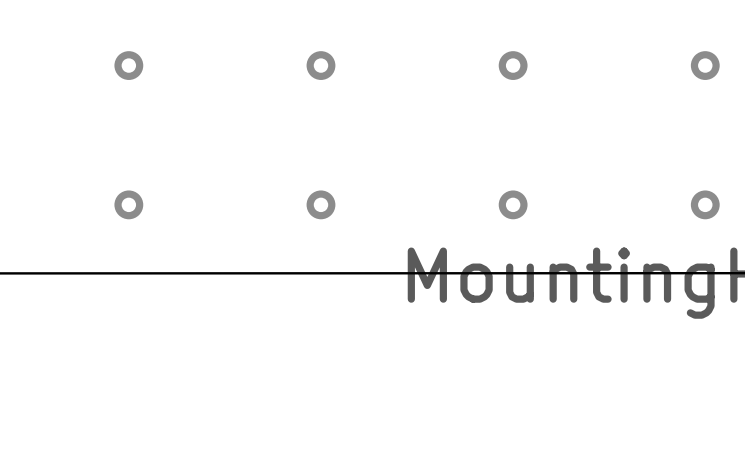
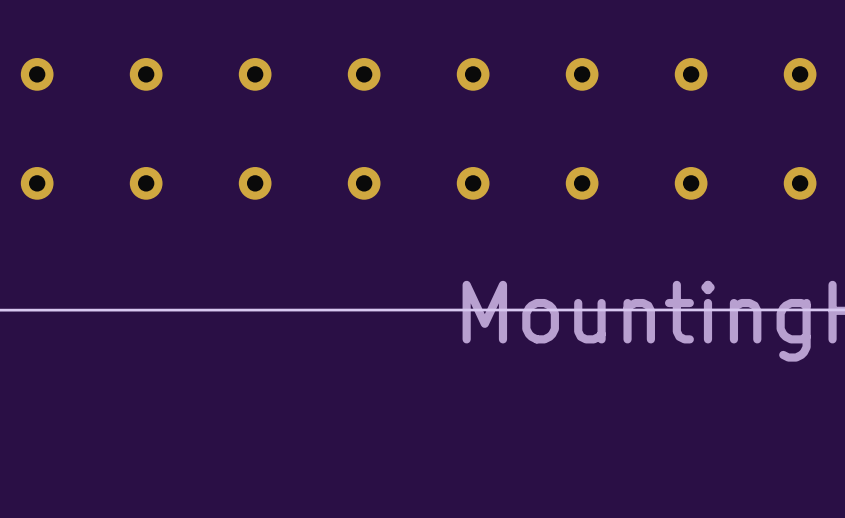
via: none -> (37, 74)
via: none -> (255, 74)
via: none -> (473, 74)
via: none -> (691, 74)
via: none -> (37, 183)
via: none -> (255, 183)
via: none -> (473, 183)
via: none -> (691, 183)
via position: (128, 204) -> (146, 183)
via position: (320, 204) -> (364, 183)
via position: (513, 204) -> (582, 183)
via position: (705, 204) -> (800, 183)

